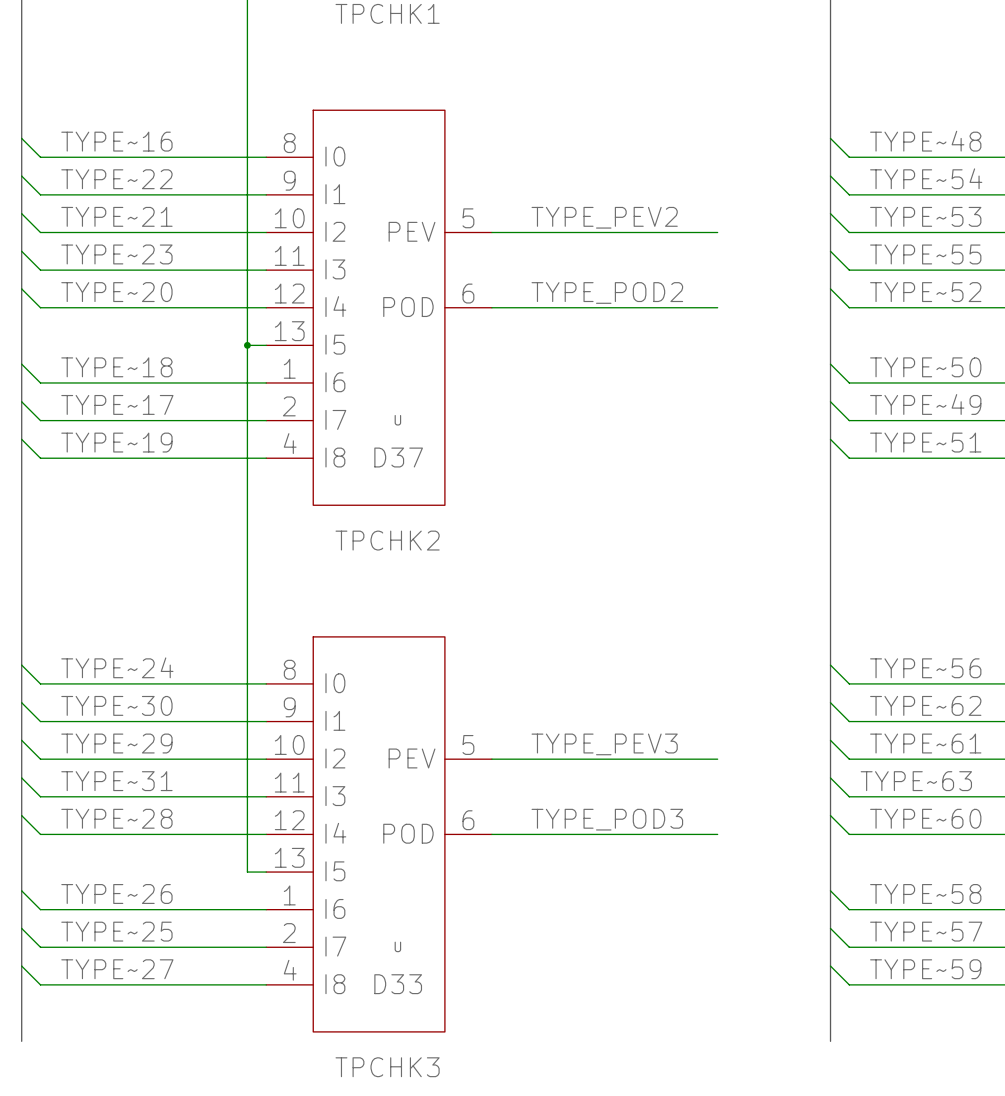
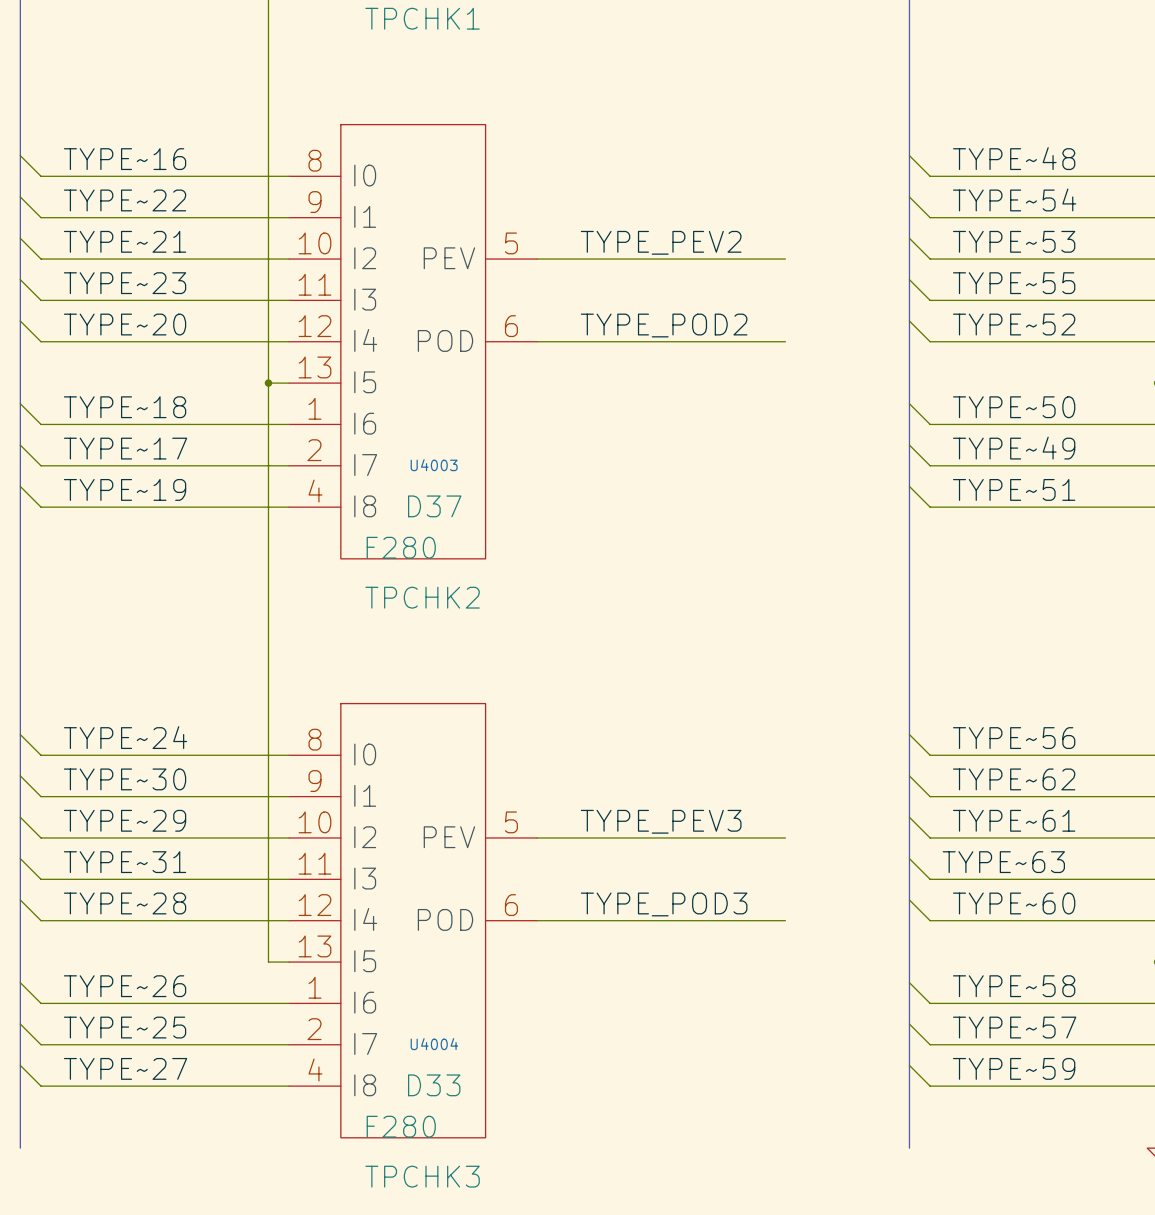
U name: U (397, 420) -> U4003 (434, 465)
U value: none -> F280 (401, 547)
U name: U (397, 946) -> U4004 (434, 1044)
U value: none -> F280 (401, 1126)

